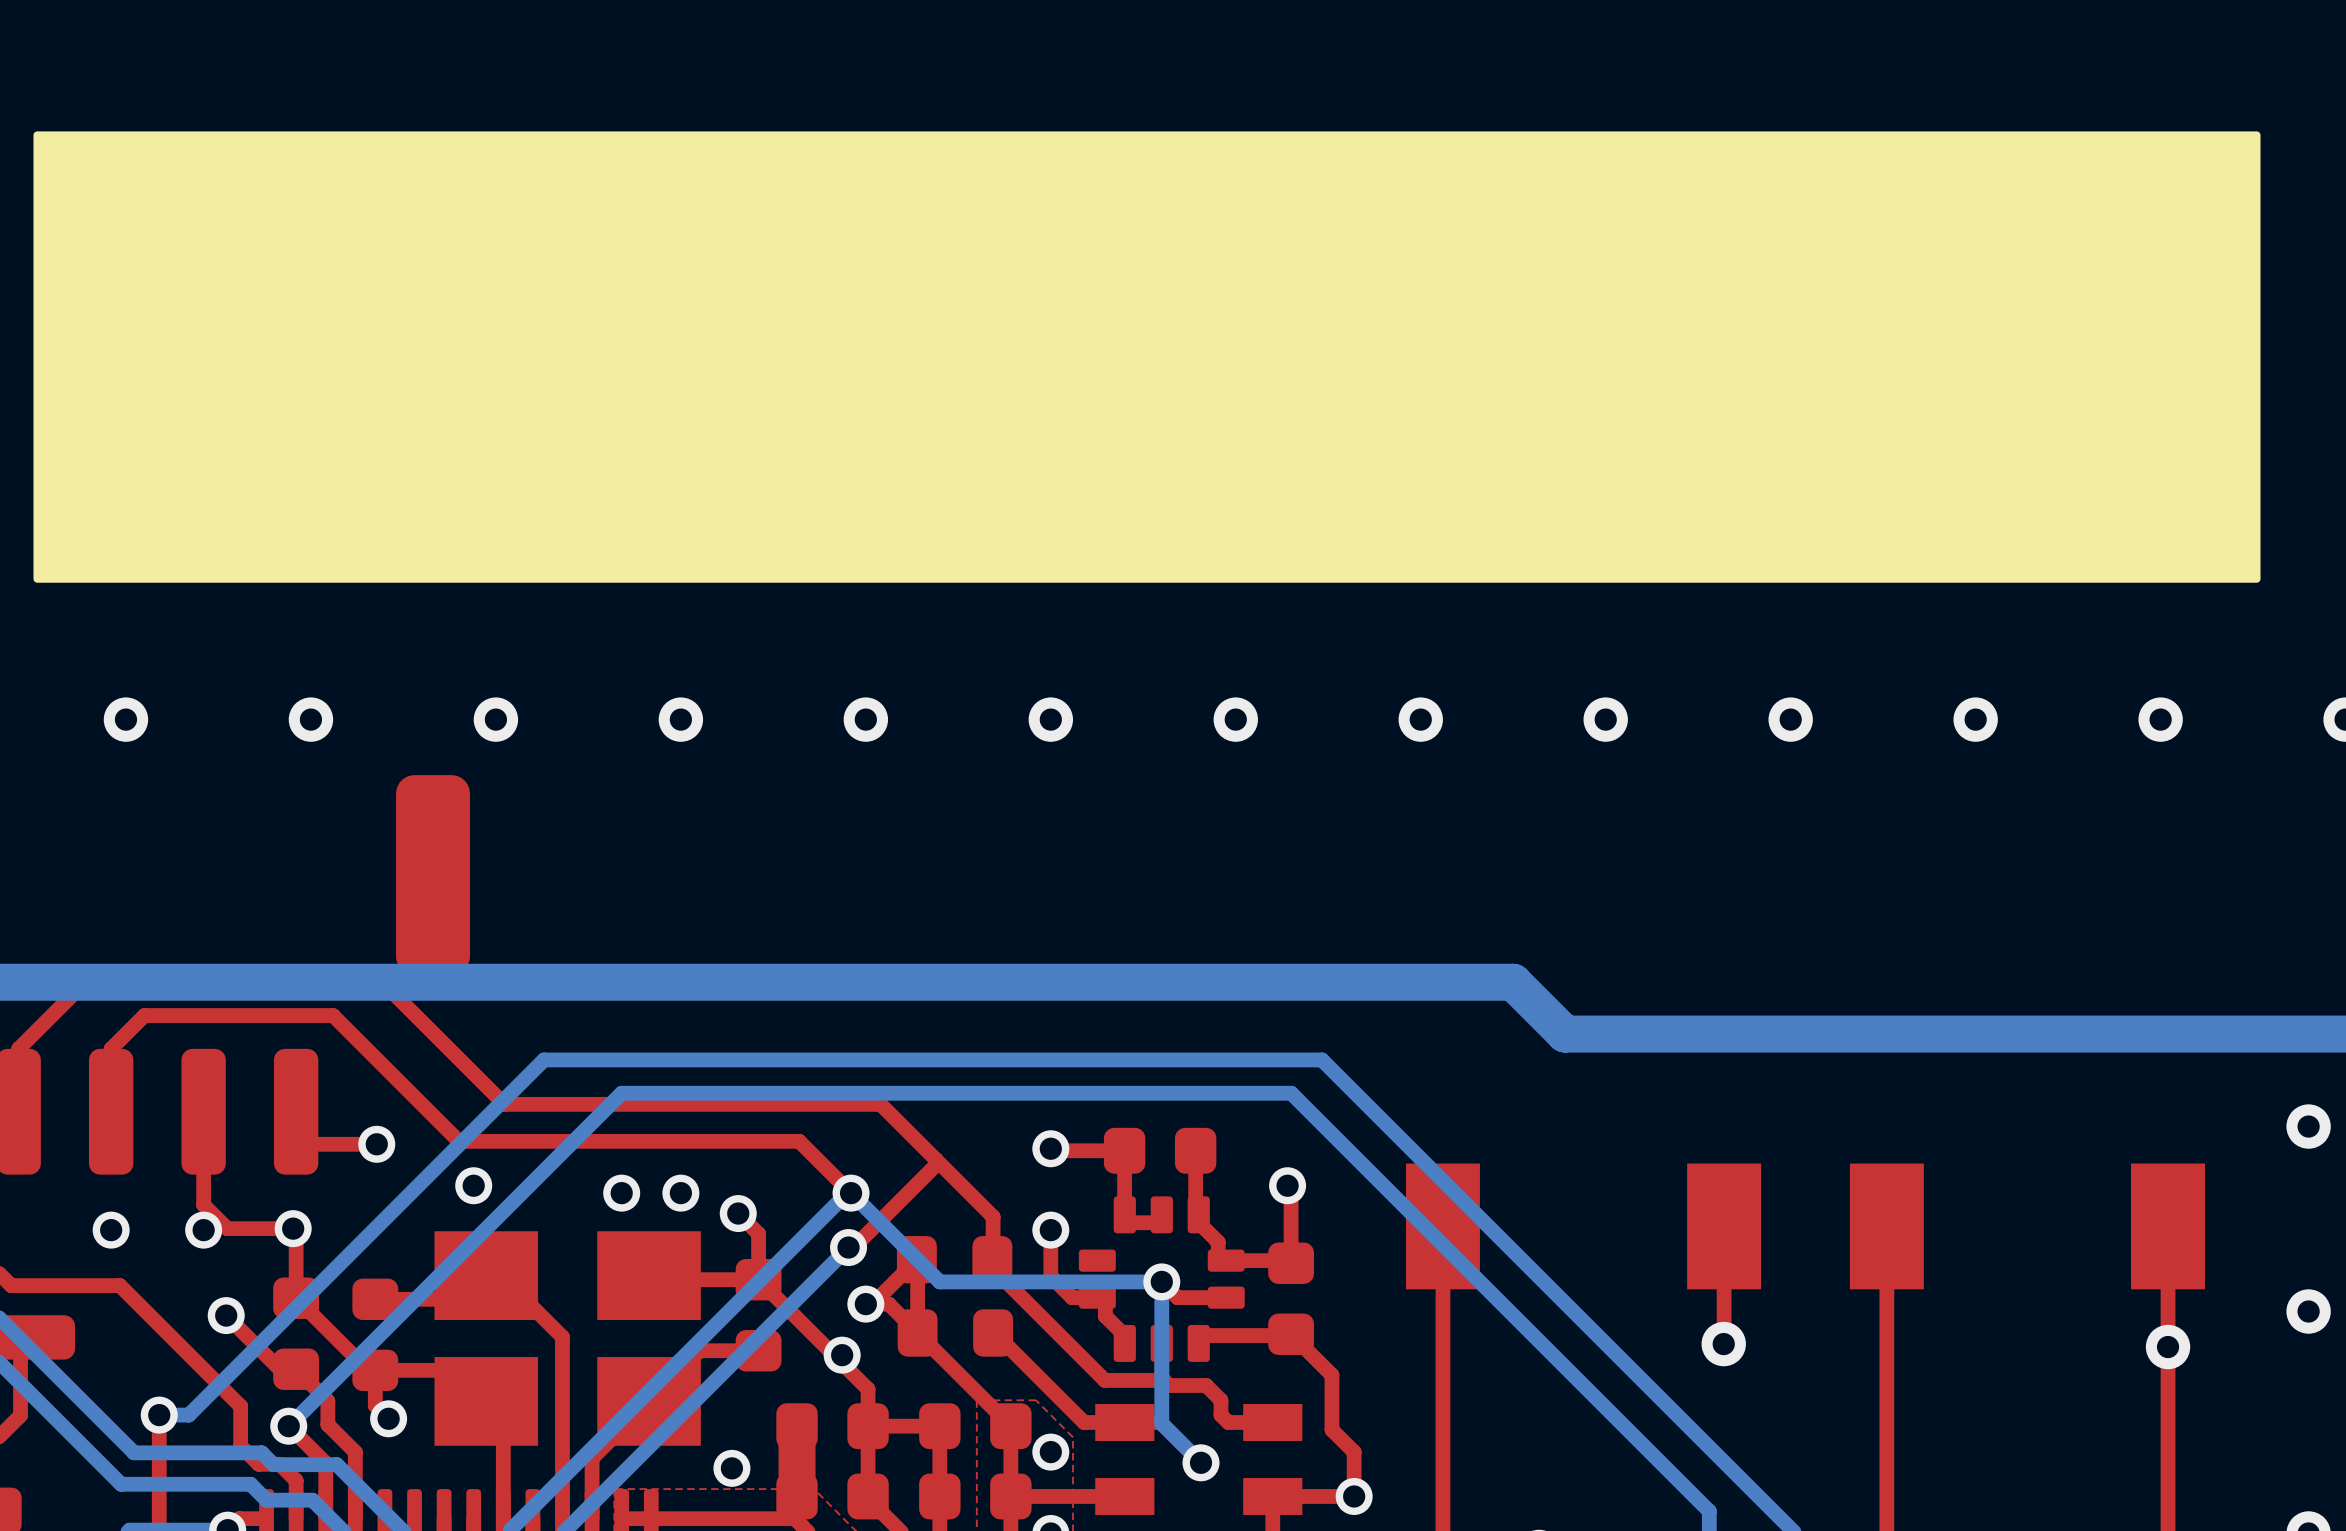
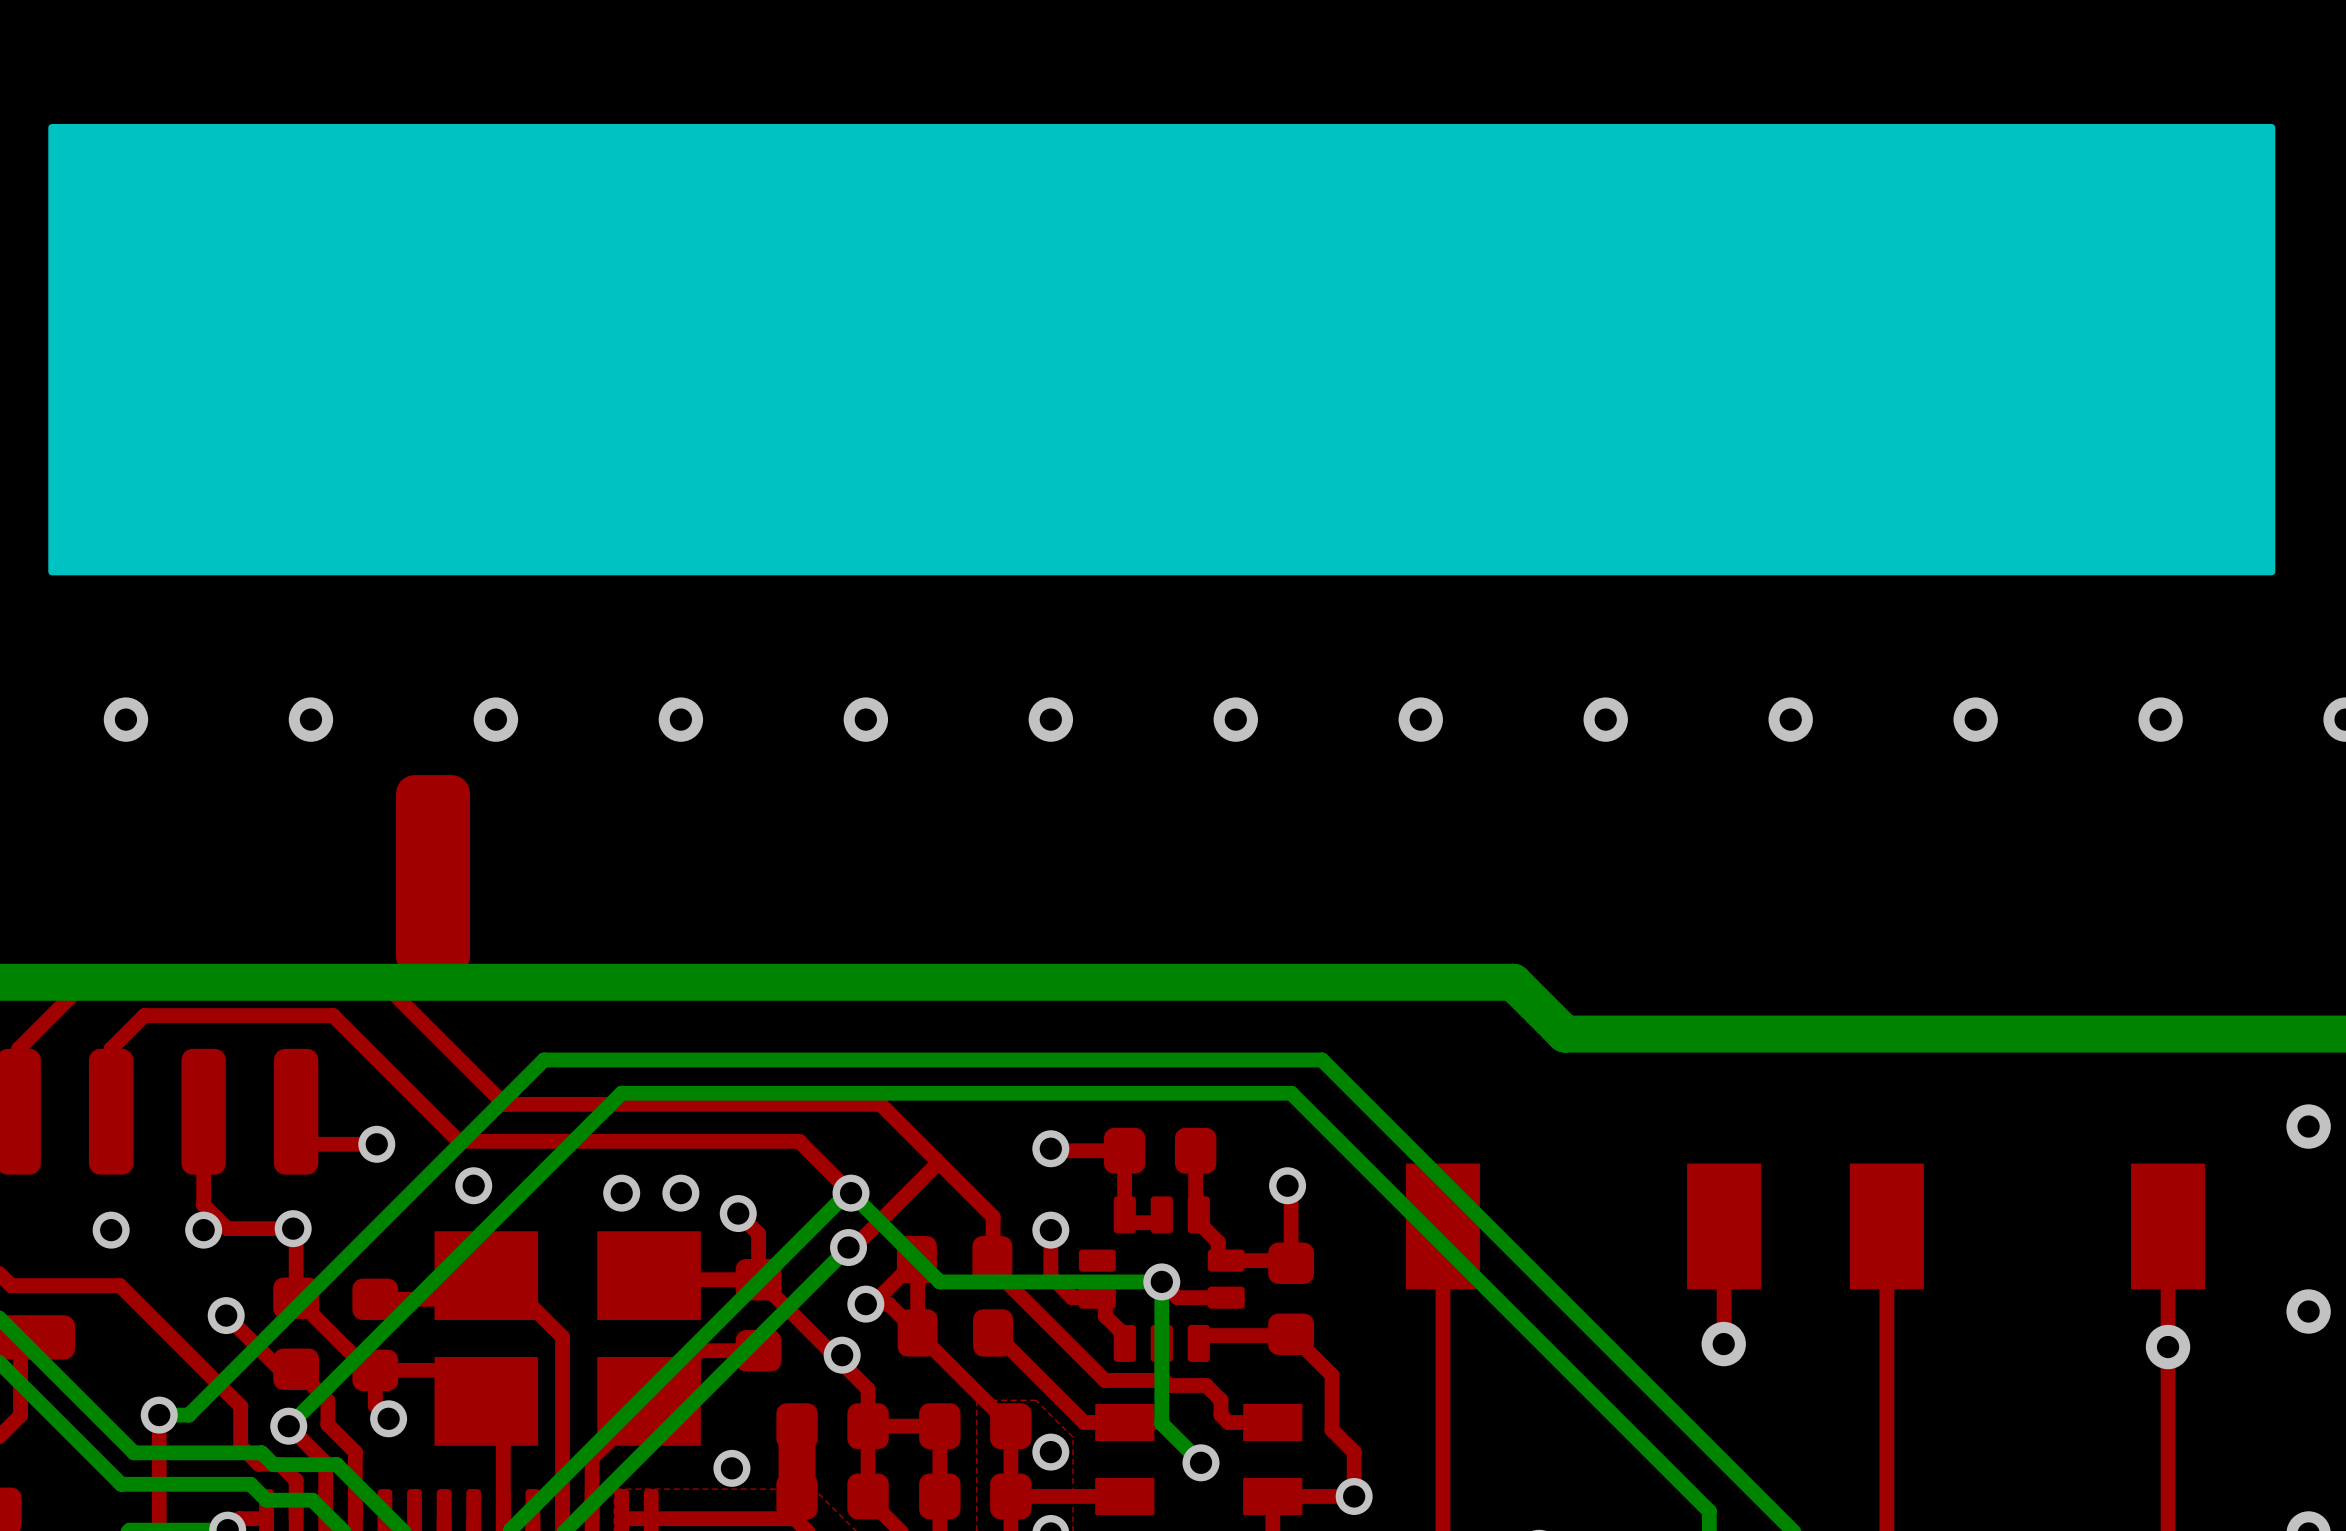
drawing position: (1147, 357) -> (1161, 349)

